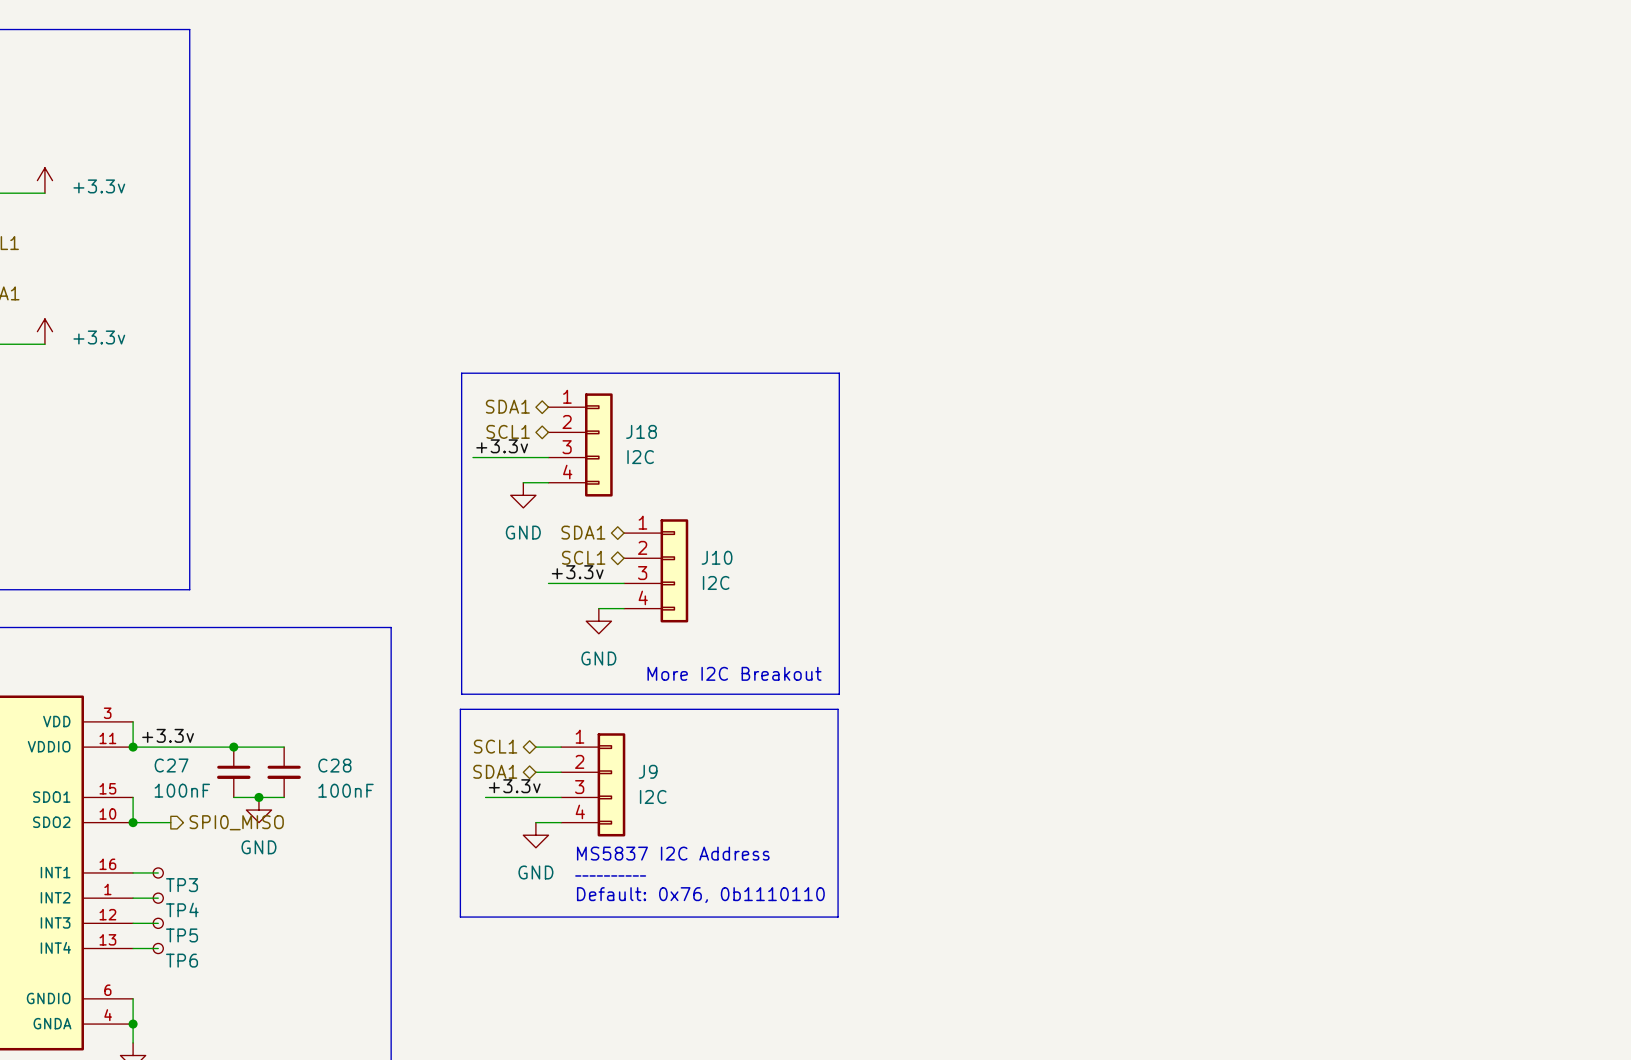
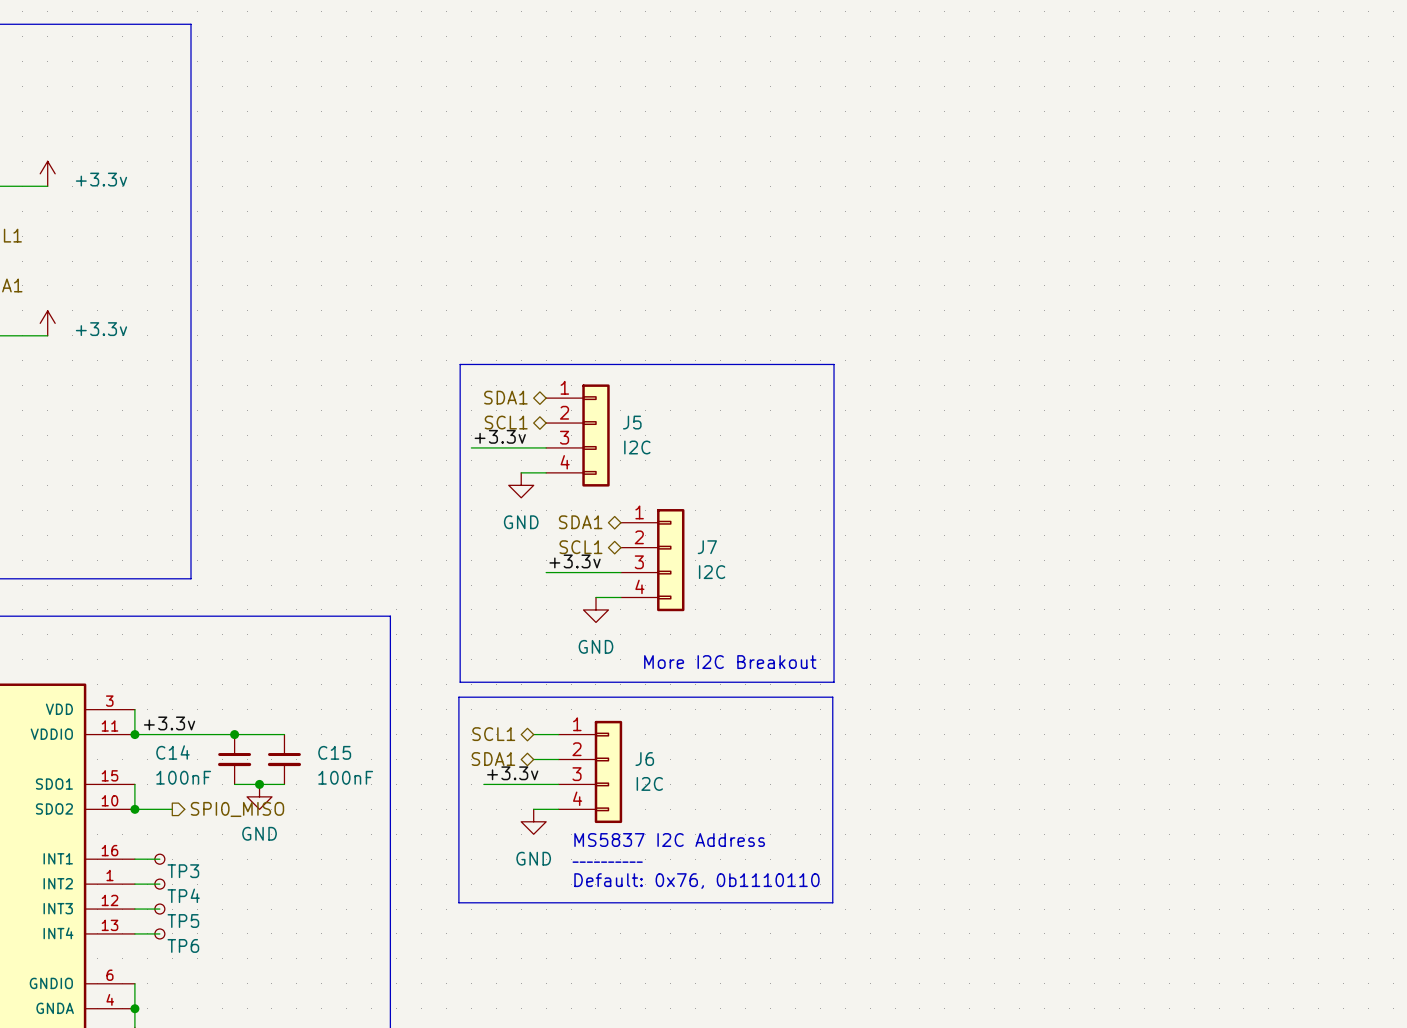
J18 name: J18 (641, 431) -> J5 (632, 422)
J10 name: J10 (717, 557) -> J7 (707, 547)
C27 name: C27 (171, 765) -> C14 (172, 752)
C28 name: C28 (334, 765) -> C15 (334, 752)
J9 name: J9 (648, 771) -> J6 (644, 759)

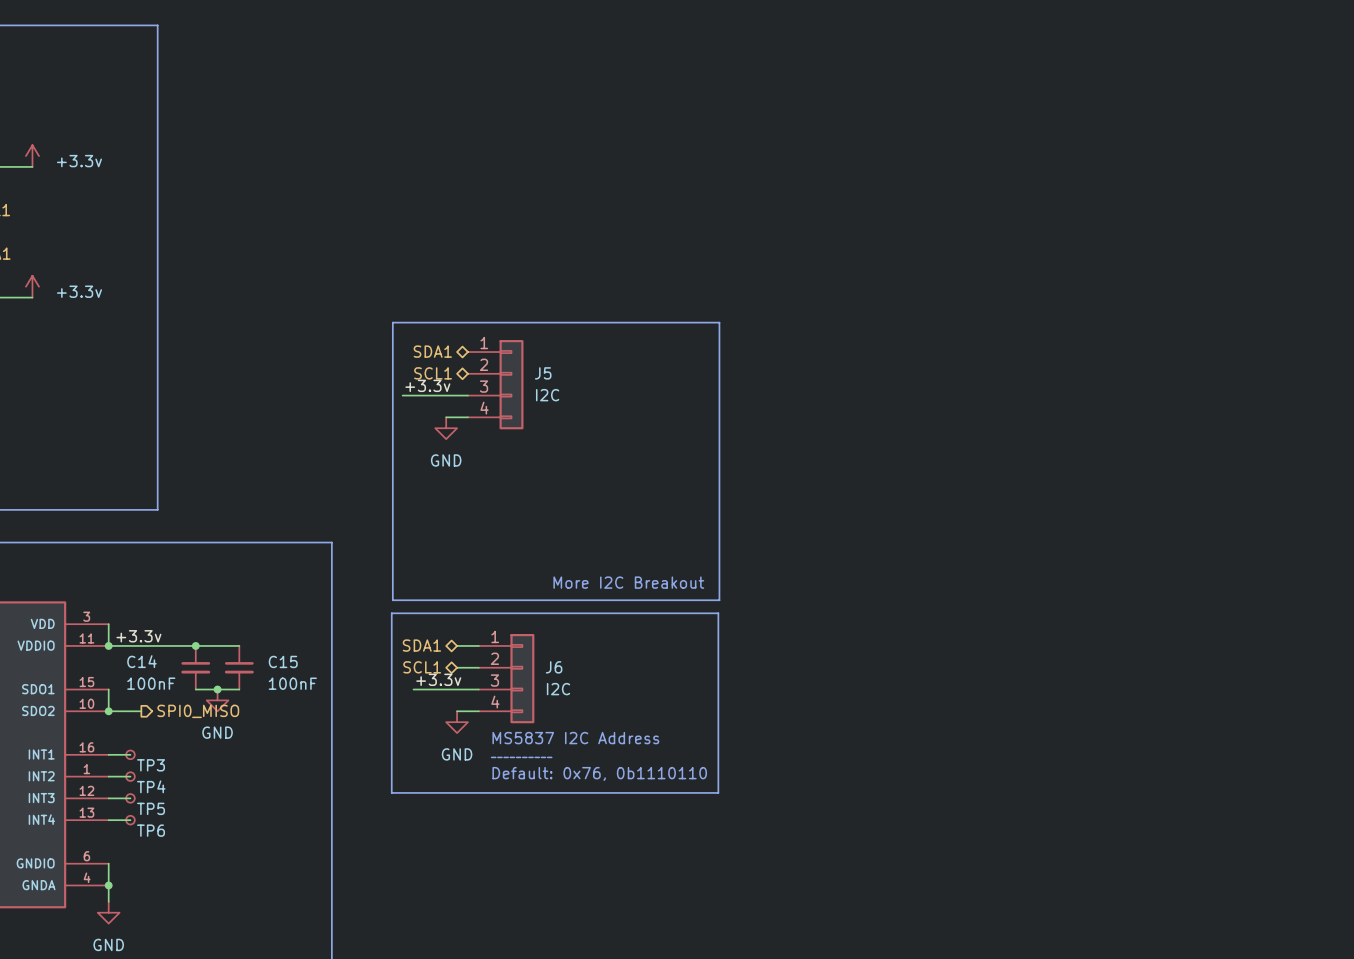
hierarchical label: SDA1 (580, 522) -> none
hierarchical label: SCL1 (580, 547) -> none
J7: I2C (652, 560) -> none
label: +3.3v (575, 561) -> none
wire: (546, 572) (620, 572) -> none
wire: (595, 597) (620, 597) -> none
power symbol: GND (595, 609) -> none
hierarchical label: SCL1 (493, 734) -> SDA1 (421, 645)
hierarchical label: SDA1 (493, 759) -> SCL1 (422, 667)

